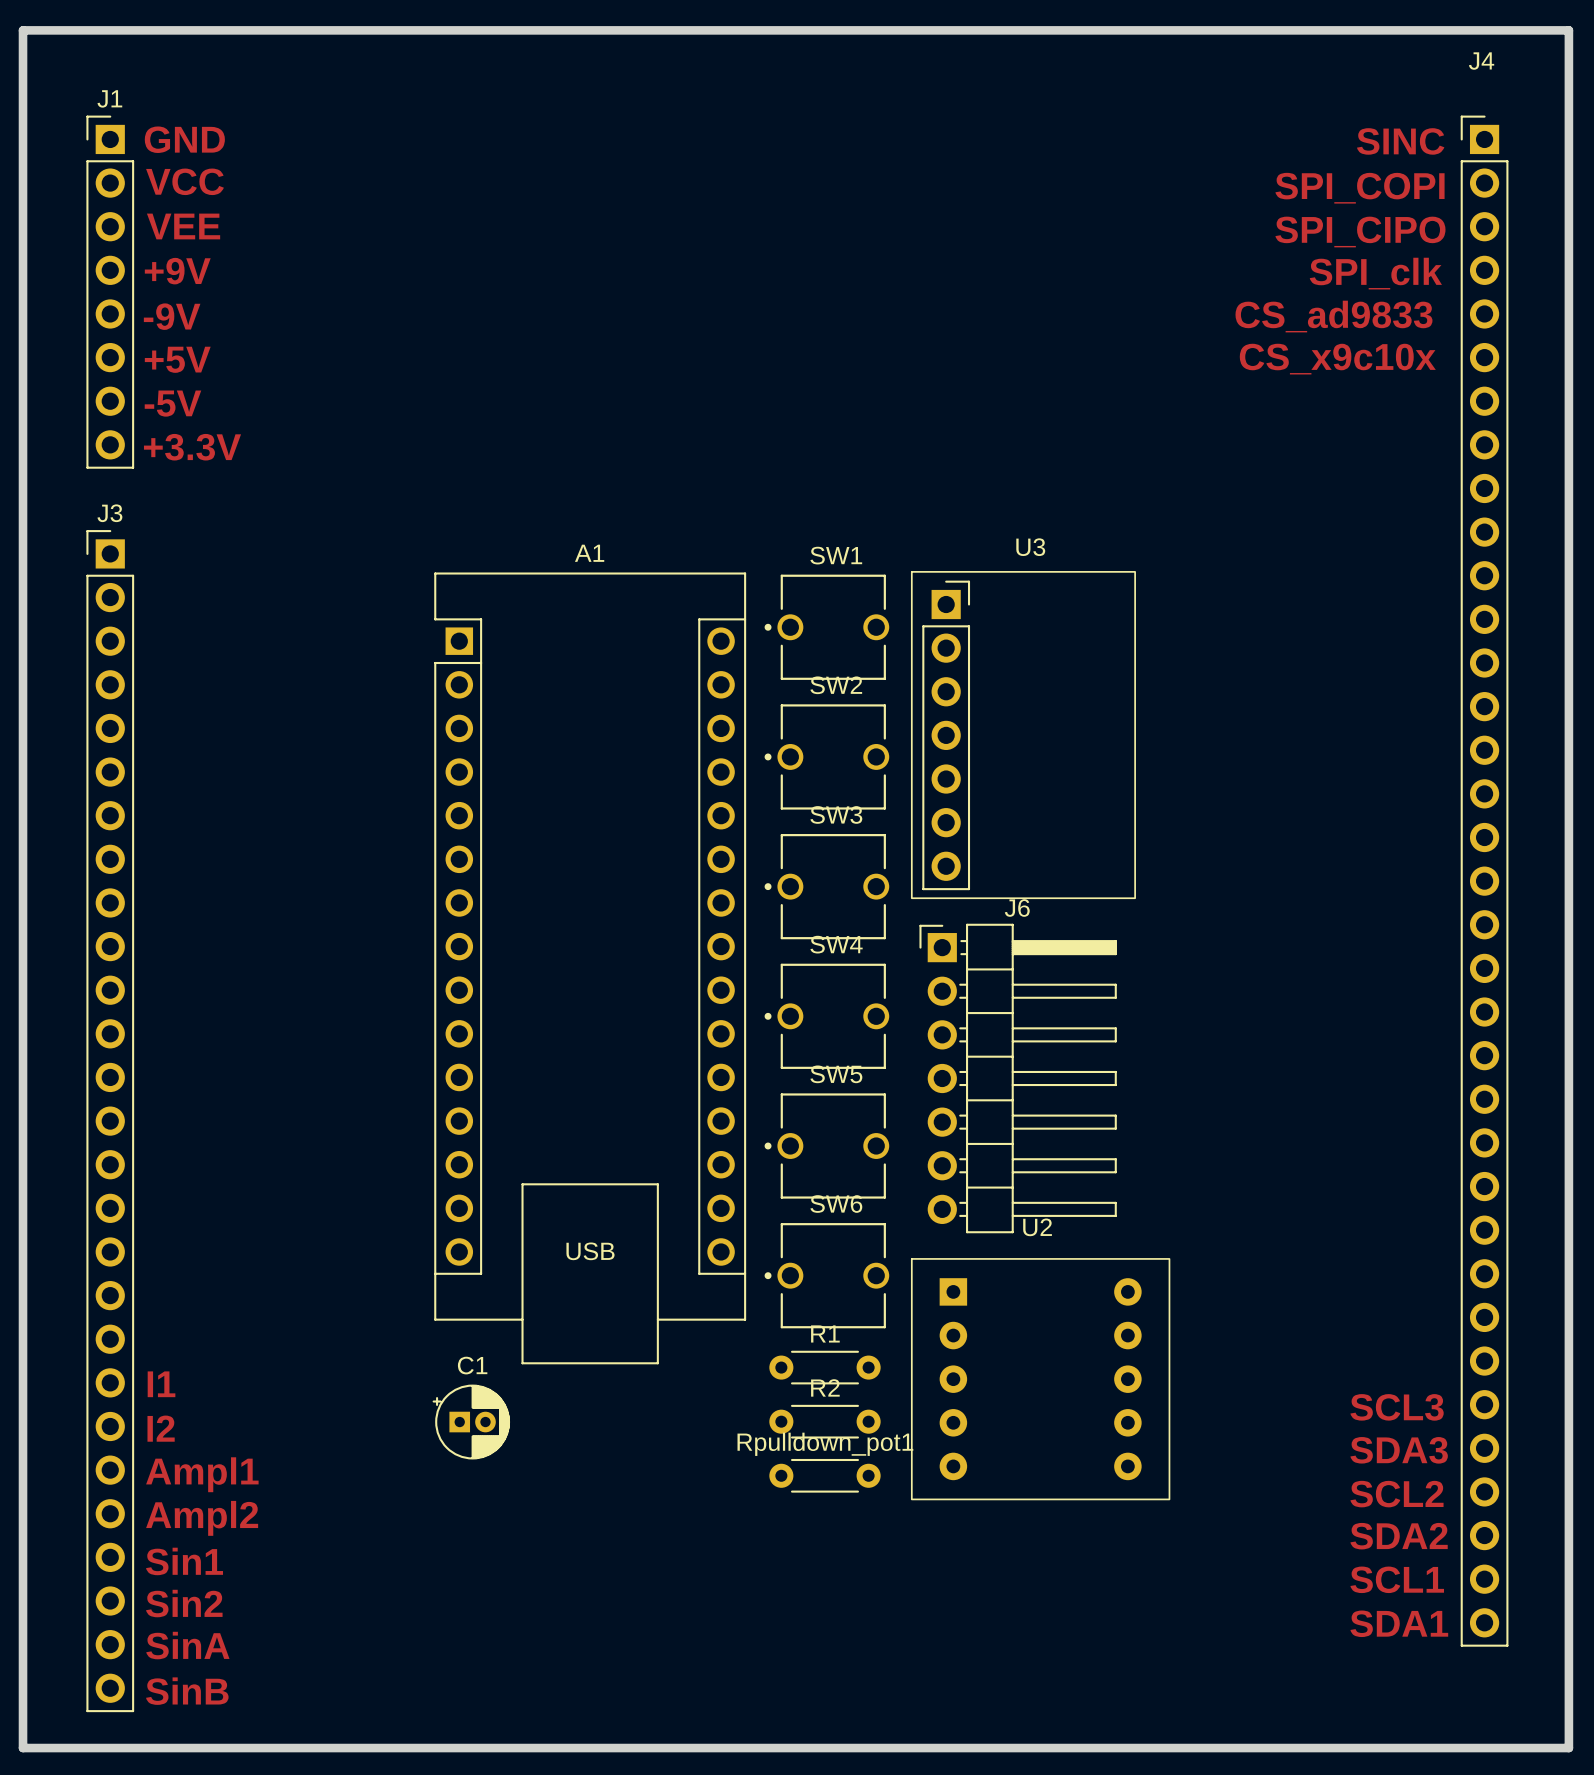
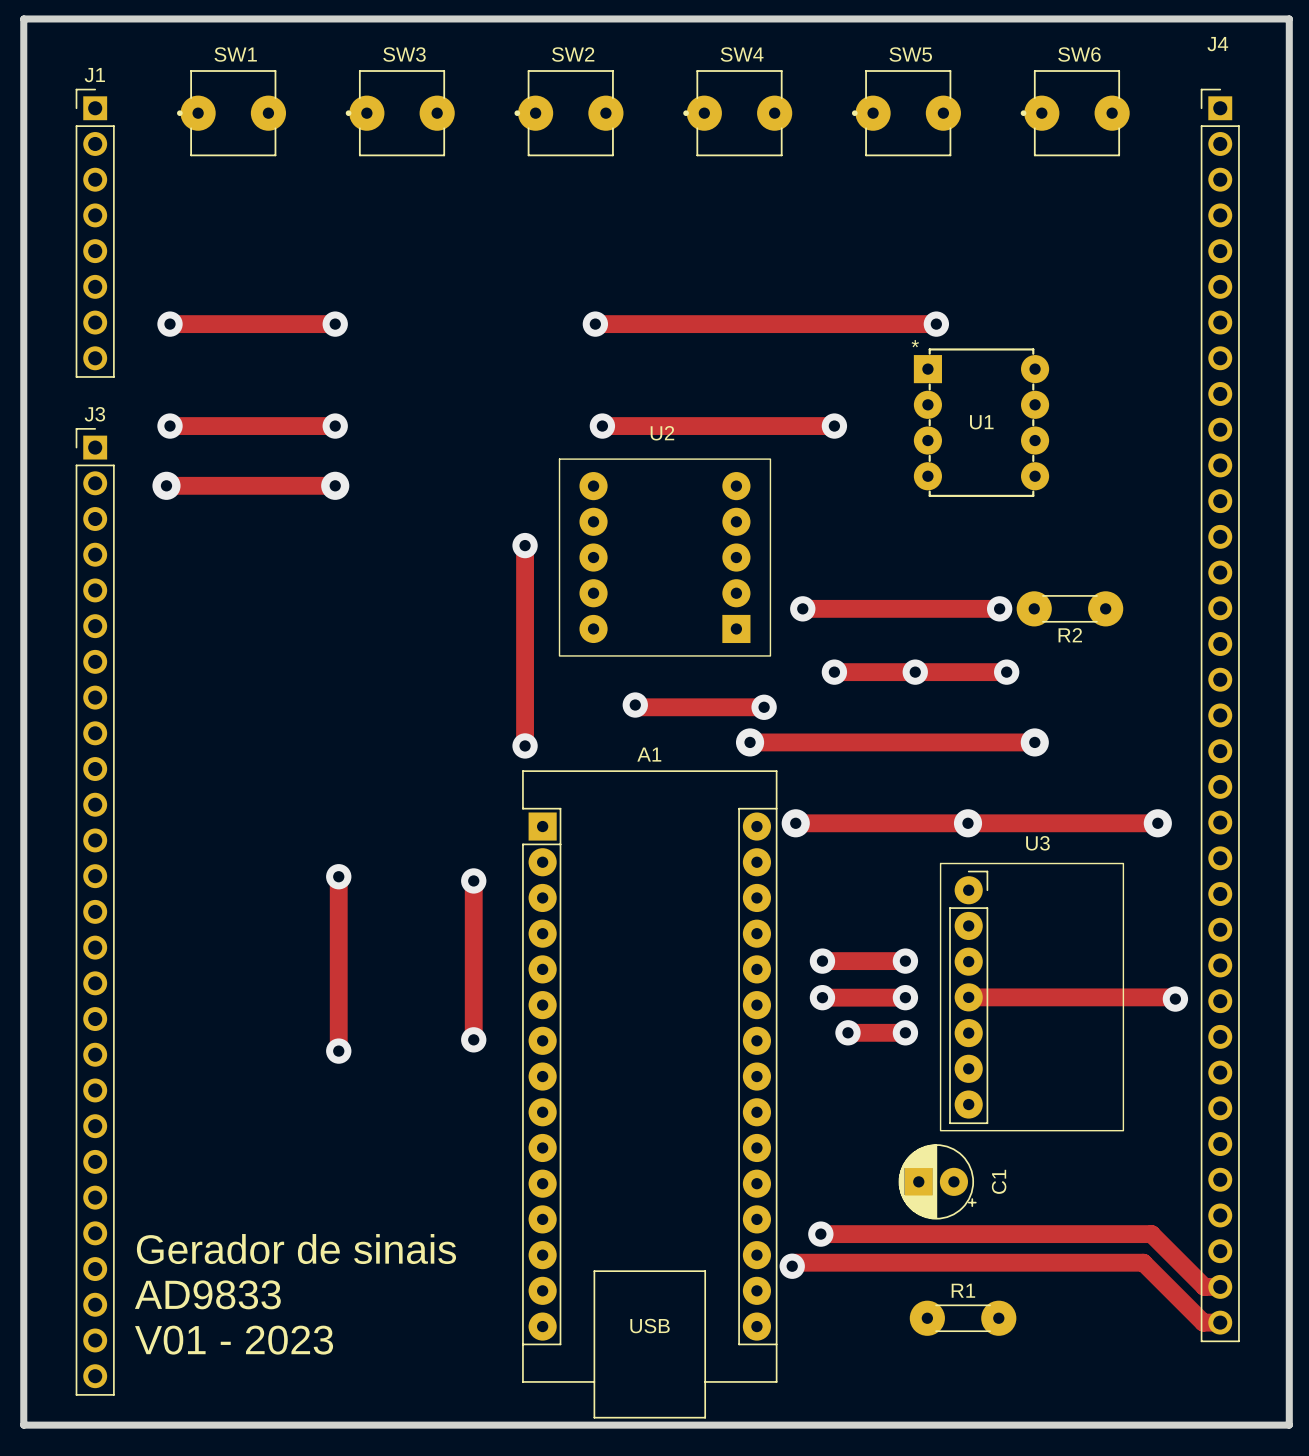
text: GND (184, 139) -> none
text: SINC (1400, 141) -> none
text: VCC (184, 181) -> none
text: SPI_COPI (1359, 188) -> none
text: VEE (183, 226) -> none
text: SPI_CIPO (1360, 232) -> none
text: +9V (177, 271) -> none
text: SPI_clk (1375, 273) -> none
text: -9V (172, 316) -> none
text: CS_ad9833 (1333, 316) -> none
text: +5V (177, 359) -> none
text: CS_x9c10x (1337, 359) -> none
text: -5V (172, 403) -> none
track: none -> (170, 324) (335, 324)
via: none -> (170, 324)
via: none -> (335, 324)
track: none -> (595, 324) (936, 324)
via: none -> (595, 324)
via: none -> (936, 324)
text: +3.3V (192, 447) -> none
U1: none -> (981, 422)
track: none -> (170, 426) (335, 426)
via: none -> (170, 426)
via: none -> (335, 426)
track: none -> (602, 426) (834, 426)
via: none -> (602, 426)
via: none -> (834, 426)
U3 footprint: [910, 571, 1136, 900] -> [939, 862, 1125, 1132]
A1 footprint: [434, 572, 747, 1365] -> [522, 770, 778, 1419]
SW1 footprint: [764, 574, 890, 680] -> [177, 70, 287, 157]
track: none -> (166, 485) (335, 485)
via: none -> (166, 485)
via: none -> (335, 485)
track: none -> (525, 545) (525, 745)
via: none -> (525, 545)
SW2 footprint: [764, 704, 890, 810] -> [514, 70, 624, 157]
track: none -> (802, 608) (999, 608)
via: none -> (802, 608)
via: none -> (999, 608)
track: none -> (834, 672) (1006, 672)
via: none -> (834, 672)
via: none -> (915, 672)
via: none -> (1006, 672)
SW3 footprint: [764, 834, 890, 940] -> [345, 70, 455, 157]
track: none -> (635, 705) (637, 707) (764, 707)
via: none -> (635, 705)
via: none -> (764, 707)
track: none -> (750, 742) (1034, 742)
via: none -> (750, 742)
via: none -> (1034, 742)
via: none -> (525, 745)
SW4 footprint: [764, 963, 890, 1069] -> [683, 70, 793, 157]
track: none -> (795, 823) (1157, 823)
via: none -> (795, 823)
via: none -> (968, 823)
via: none -> (1157, 823)
track: none -> (338, 876) (338, 1051)
via: none -> (338, 876)
J6: (1018, 1078) -> none
track: none -> (473, 880) (473, 1039)
via: none -> (473, 880)
SW5 footprint: [764, 1093, 890, 1199] -> [851, 70, 961, 157]
track: none -> (822, 961) (905, 961)
via: none -> (822, 961)
via: none -> (905, 961)
SW6 footprint: [764, 1223, 890, 1329] -> [1020, 70, 1130, 157]
track: none -> (822, 997) (905, 997)
via: none -> (822, 997)
via: none -> (905, 997)
track: none -> (968, 997) (1173, 997) (1175, 999)
via: none -> (1175, 999)
U2 footprint: [910, 1258, 1171, 1501] -> [558, 458, 772, 657]
track: none -> (847, 1032) (905, 1032)
via: none -> (847, 1032)
via: none -> (905, 1032)
via: none -> (473, 1039)
via: none -> (338, 1051)
R1 footprint: [769, 1350, 881, 1385] -> [909, 1300, 1017, 1336]
C1 name position: C1 (472, 1365) -> C1 (999, 1181)
text: I1 (161, 1384) -> none
C1 footprint: [432, 1384, 511, 1460] -> [898, 1144, 977, 1220]
R2 name position: R2 (825, 1387) -> R2 (1070, 635)
R2 footprint: [769, 1404, 881, 1439] -> [1016, 591, 1124, 627]
text: SCL3 (1397, 1407) -> none
text: I2 (161, 1428) -> none
text: SDA3 (1399, 1450) -> none
text: Ampl1 (202, 1474) -> none
Rpulldown_pot1: (824, 1475) -> none
text: SCL2 (1396, 1494) -> none
track: none -> (820, 1234) (1151, 1234) (1204, 1286) (1220, 1286)
via: none -> (820, 1234)
text: Ampl2 (202, 1518) -> none
text: none -> Gerador de sinais (296, 1249)
text: SDA2 (1399, 1536) -> none
track: none -> (792, 1266) (795, 1262) (1143, 1262) (1203, 1322) (1220, 1322)
via: none -> (792, 1266)
text: Sin1 (184, 1561) -> none
text: SCL1 (1397, 1579) -> none
text: Sin2 (184, 1603) -> AD9833 (207, 1294)
text: SDA1 (1399, 1623) -> none
text: SinA (187, 1645) -> V01 - 2023 (234, 1340)
text: SinB (187, 1691) -> none

